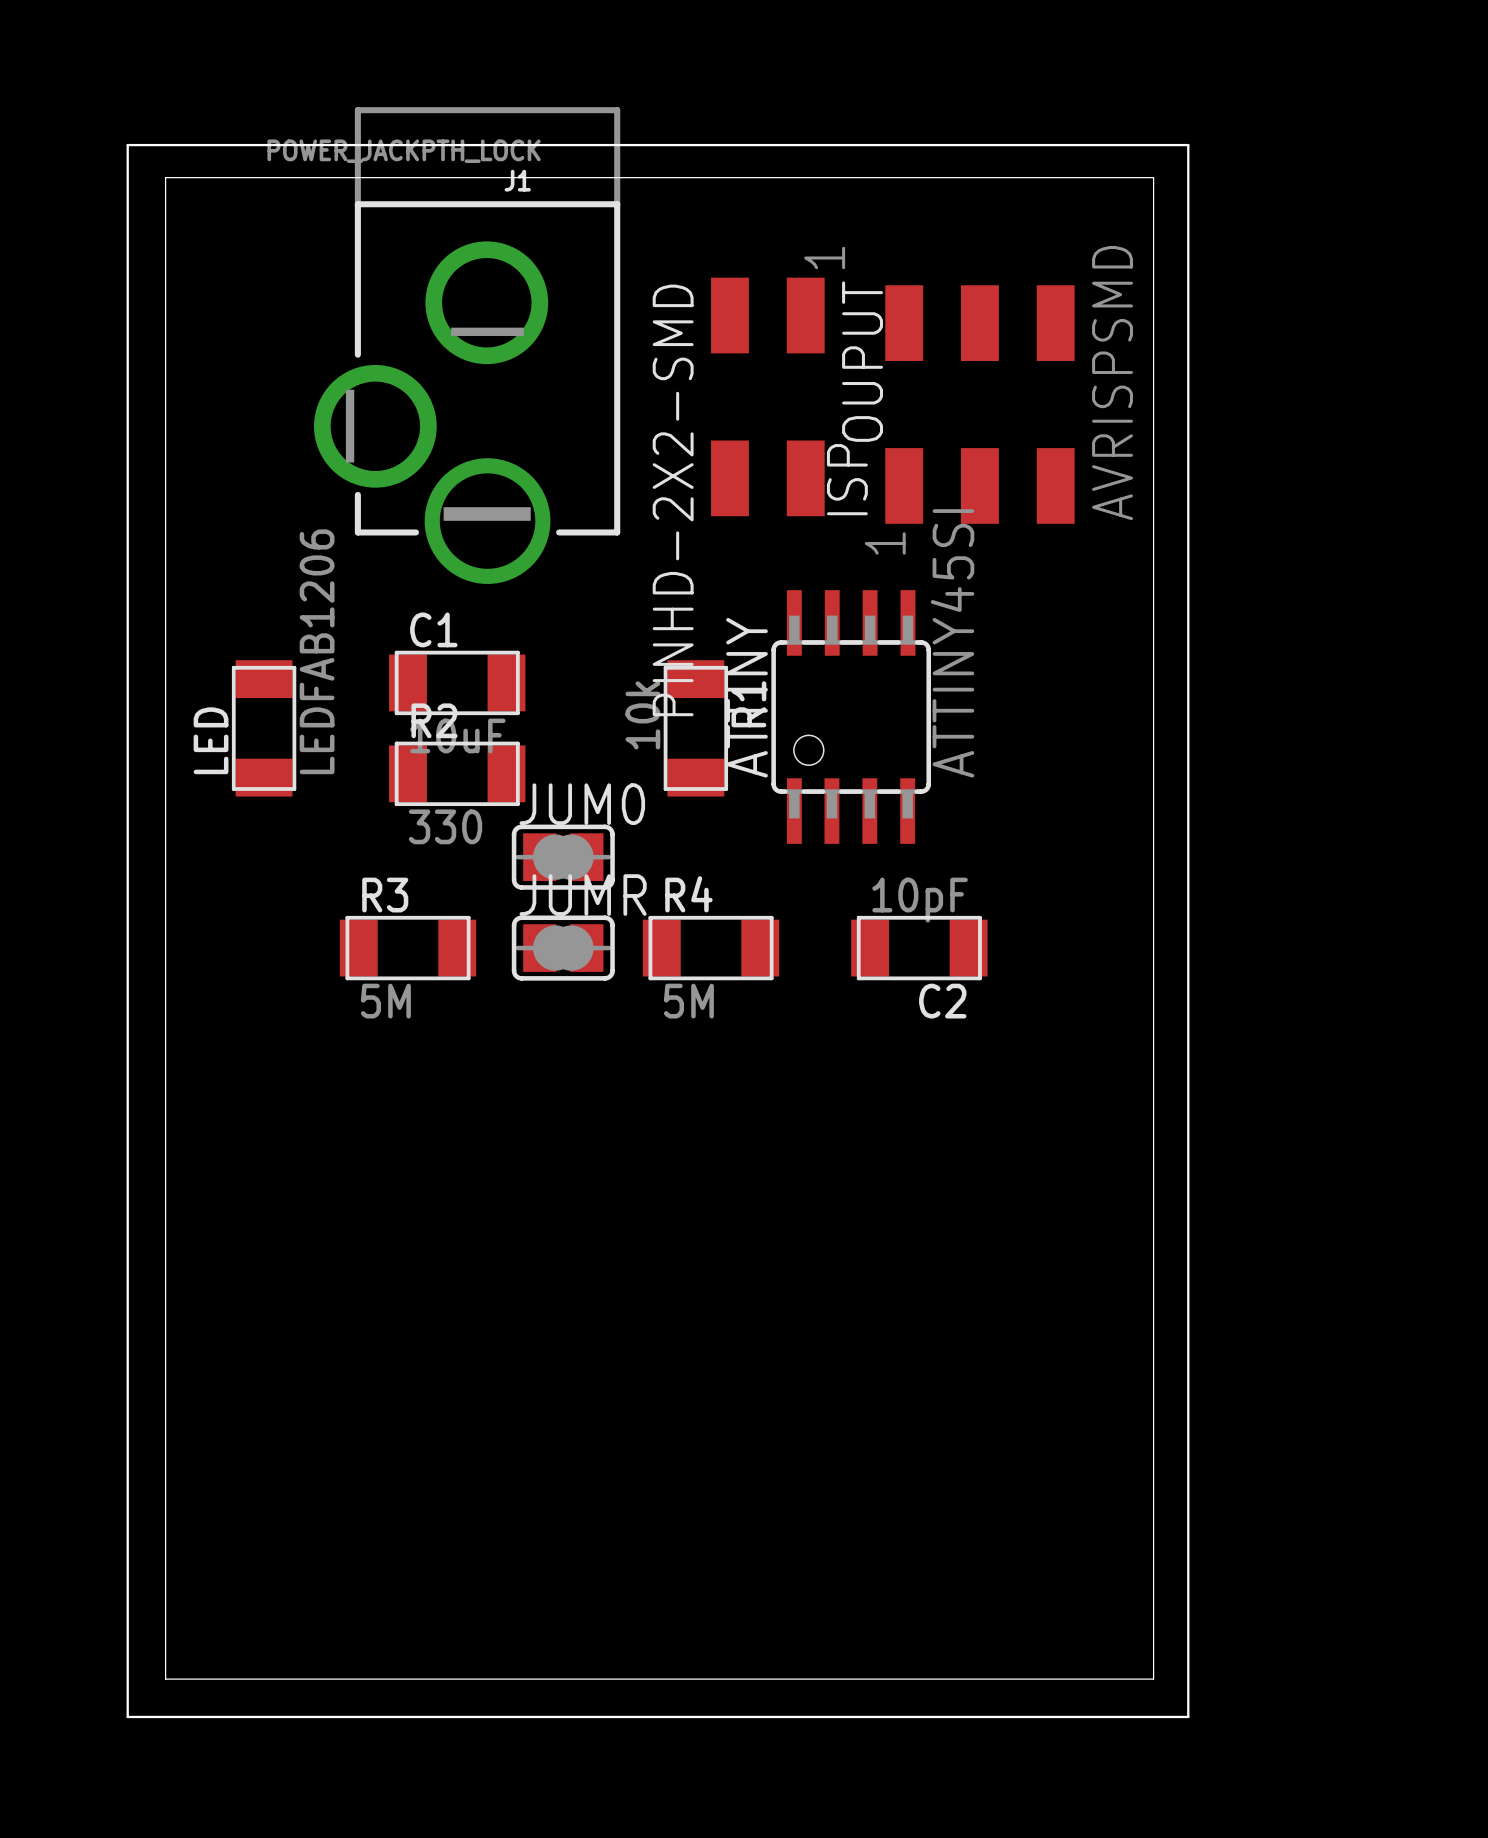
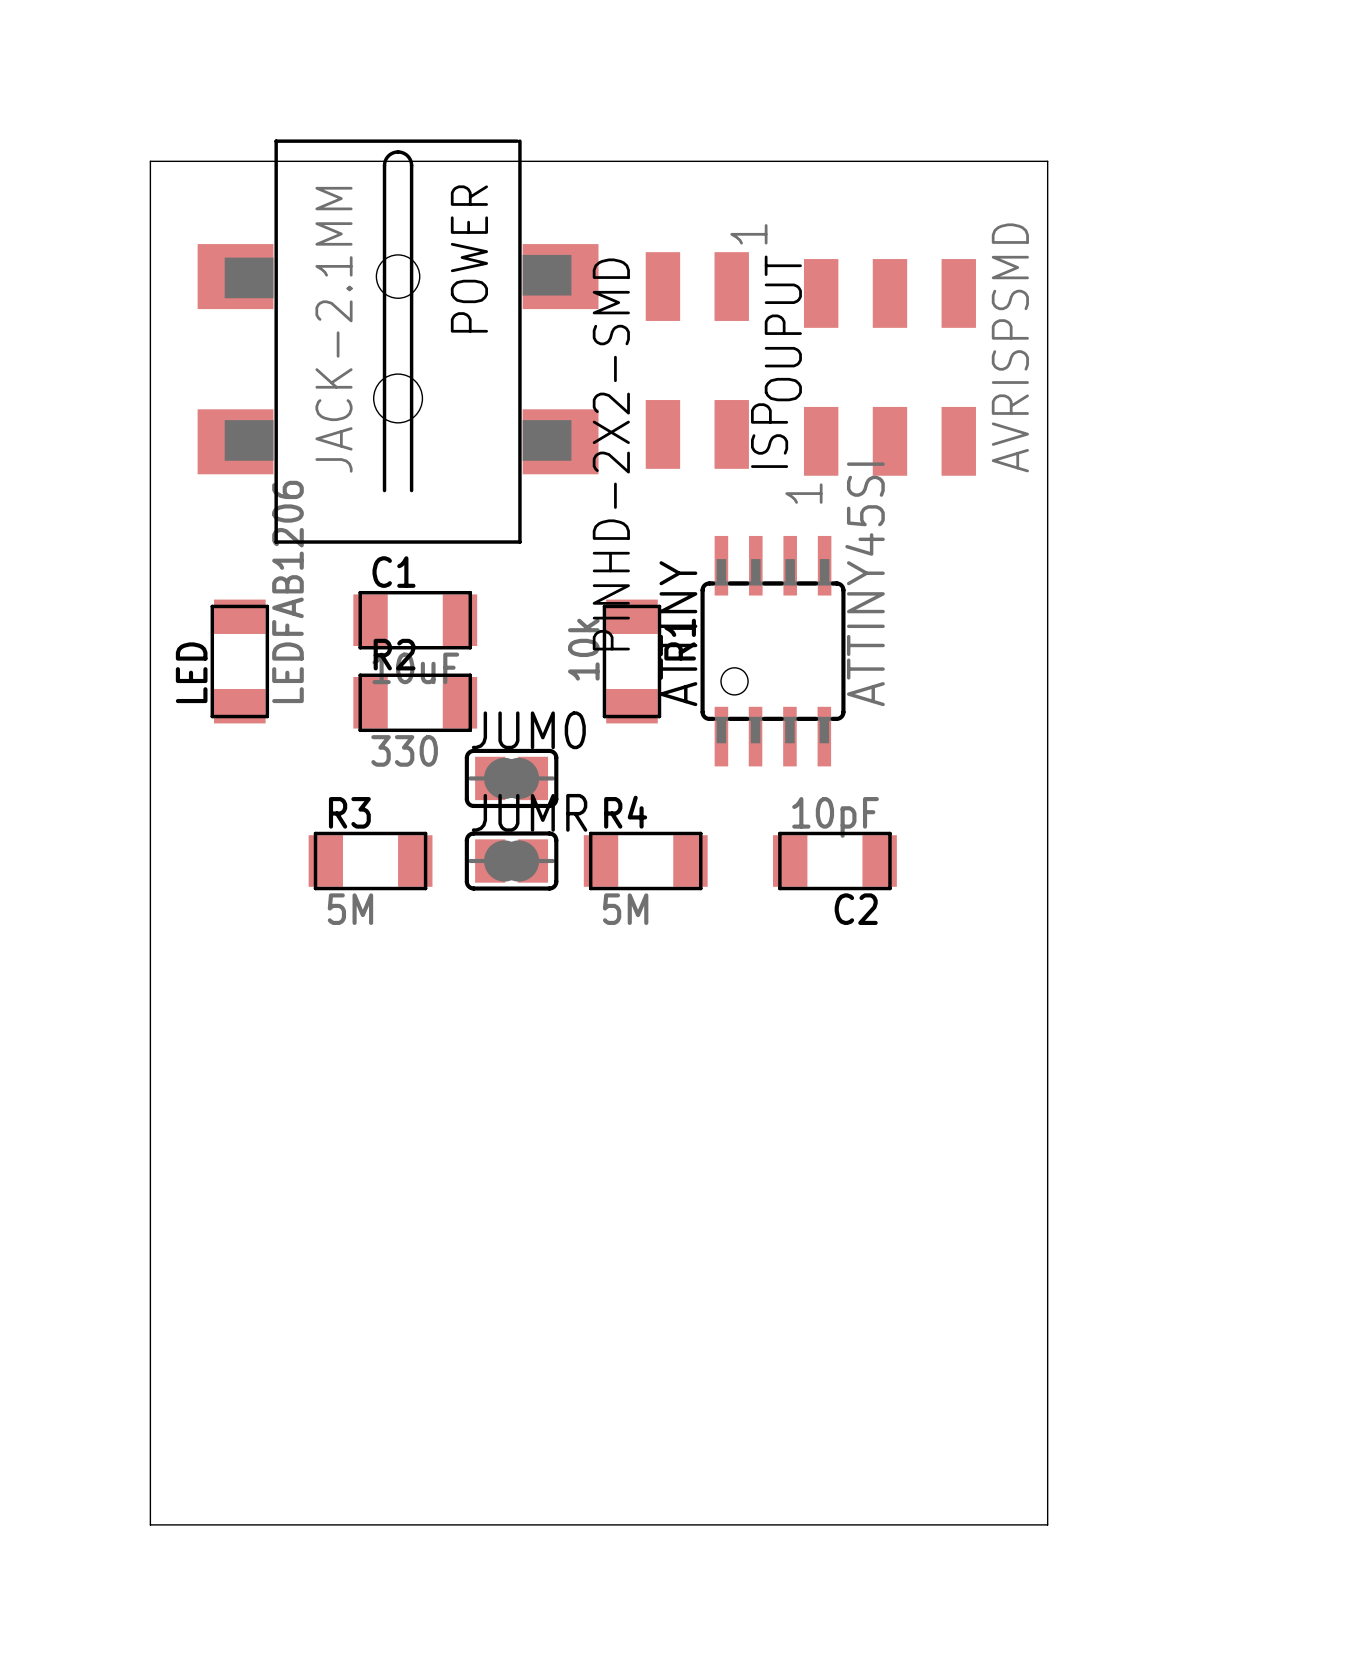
board edge: (127, 145) (1188, 145) (1188, 1716) (127, 1716) (127, 145) -> none
J1: POWER_JACKPTH_LOCK (467, 345) -> none
POWER: none -> JACK-2.1MM (398, 341)

